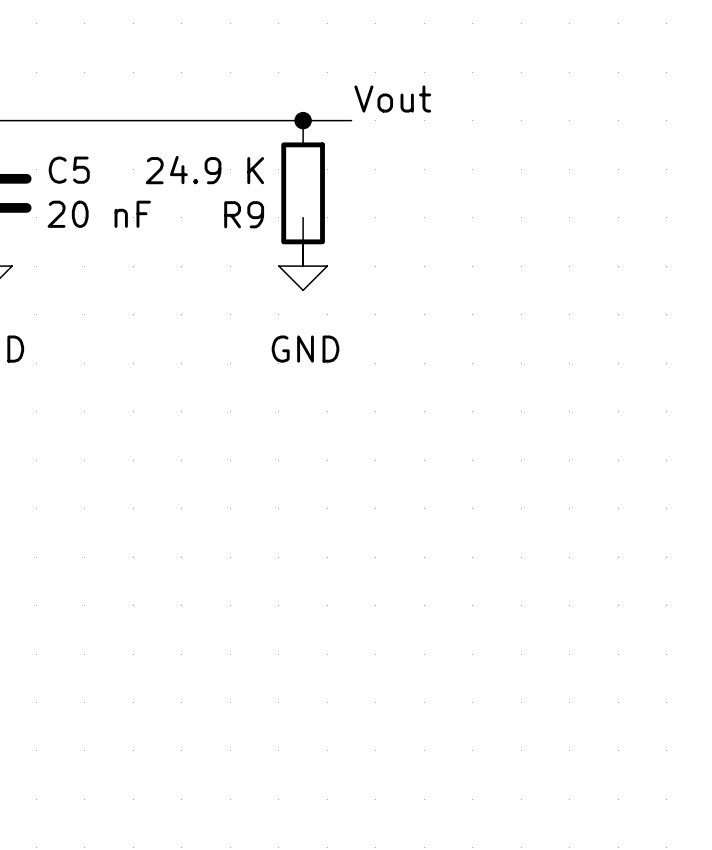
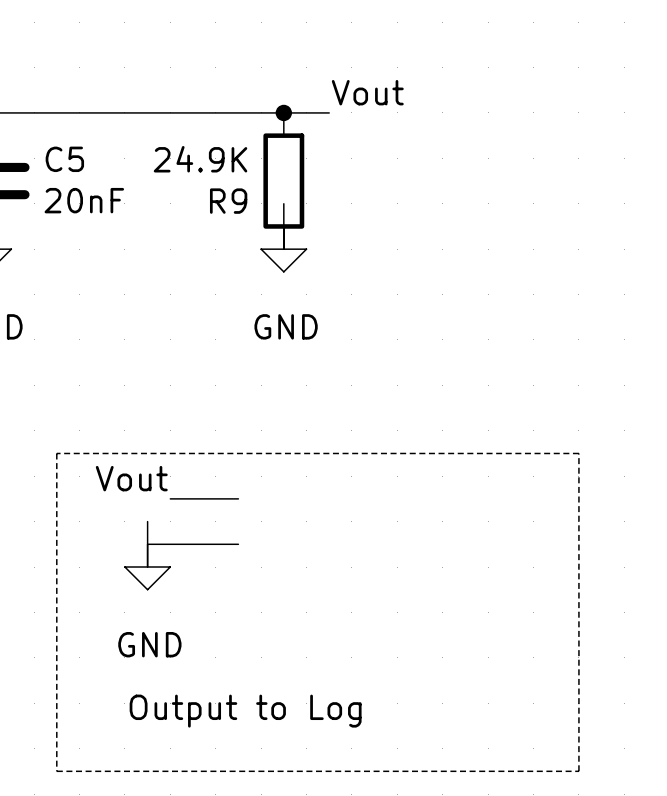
R9 value: 24.9 K (204, 170) -> 24.9K (200, 159)
C5 value: 20 nF (99, 214) -> 20nF (84, 200)
line: none -> (56, 453) (578, 453) (578, 771) (56, 771) (56, 453)
label: none -> Vout (131, 478)
wire: none -> (170, 498) (238, 498)
wire: none -> (238, 544) (147, 544) (147, 567)
power symbol: none -> GND (147, 555)
text: none -> Output to Log (245, 711)

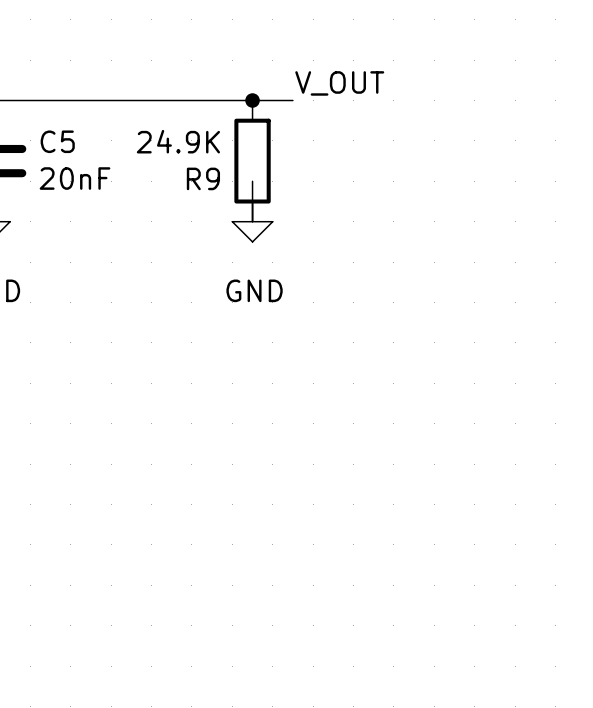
label: Vout (367, 92) -> V_OUT (339, 83)
line: (56, 453) (578, 453) (578, 771) (56, 771) (56, 453) -> none
label: Vout (131, 478) -> none
wire: (170, 498) (238, 498) -> none
wire: (238, 544) (147, 544) (147, 567) -> none
power symbol: GND (147, 555) -> none
text: Output to Log (245, 711) -> none

